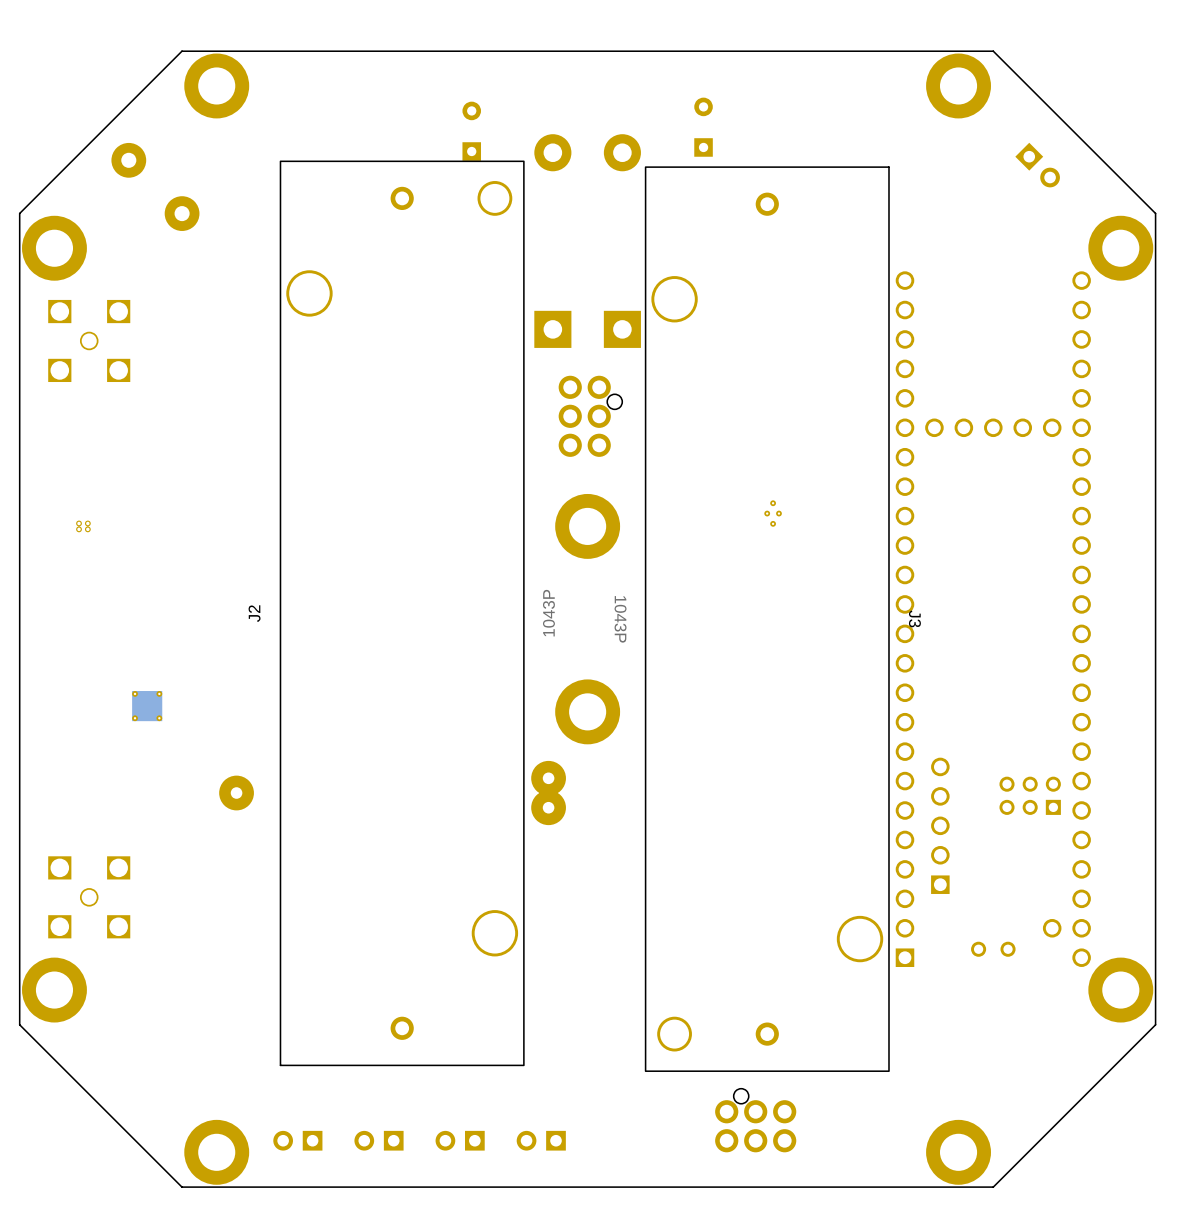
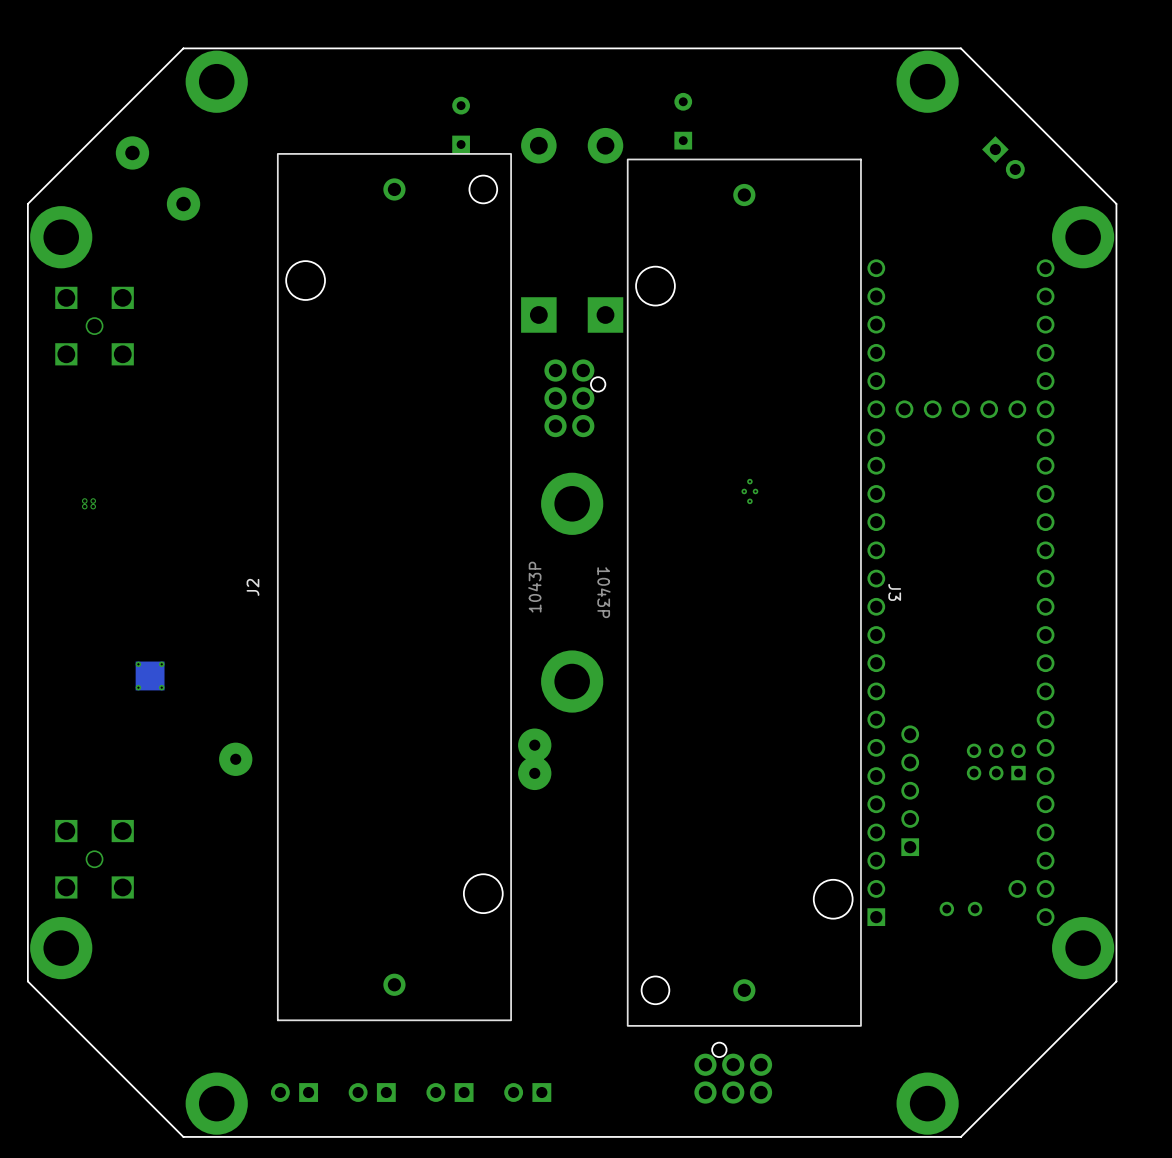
J2 footprint: [279, 160, 525, 1067] -> [277, 153, 512, 1021]
J3 footprint: [644, 166, 890, 1072] -> [627, 158, 862, 1027]

